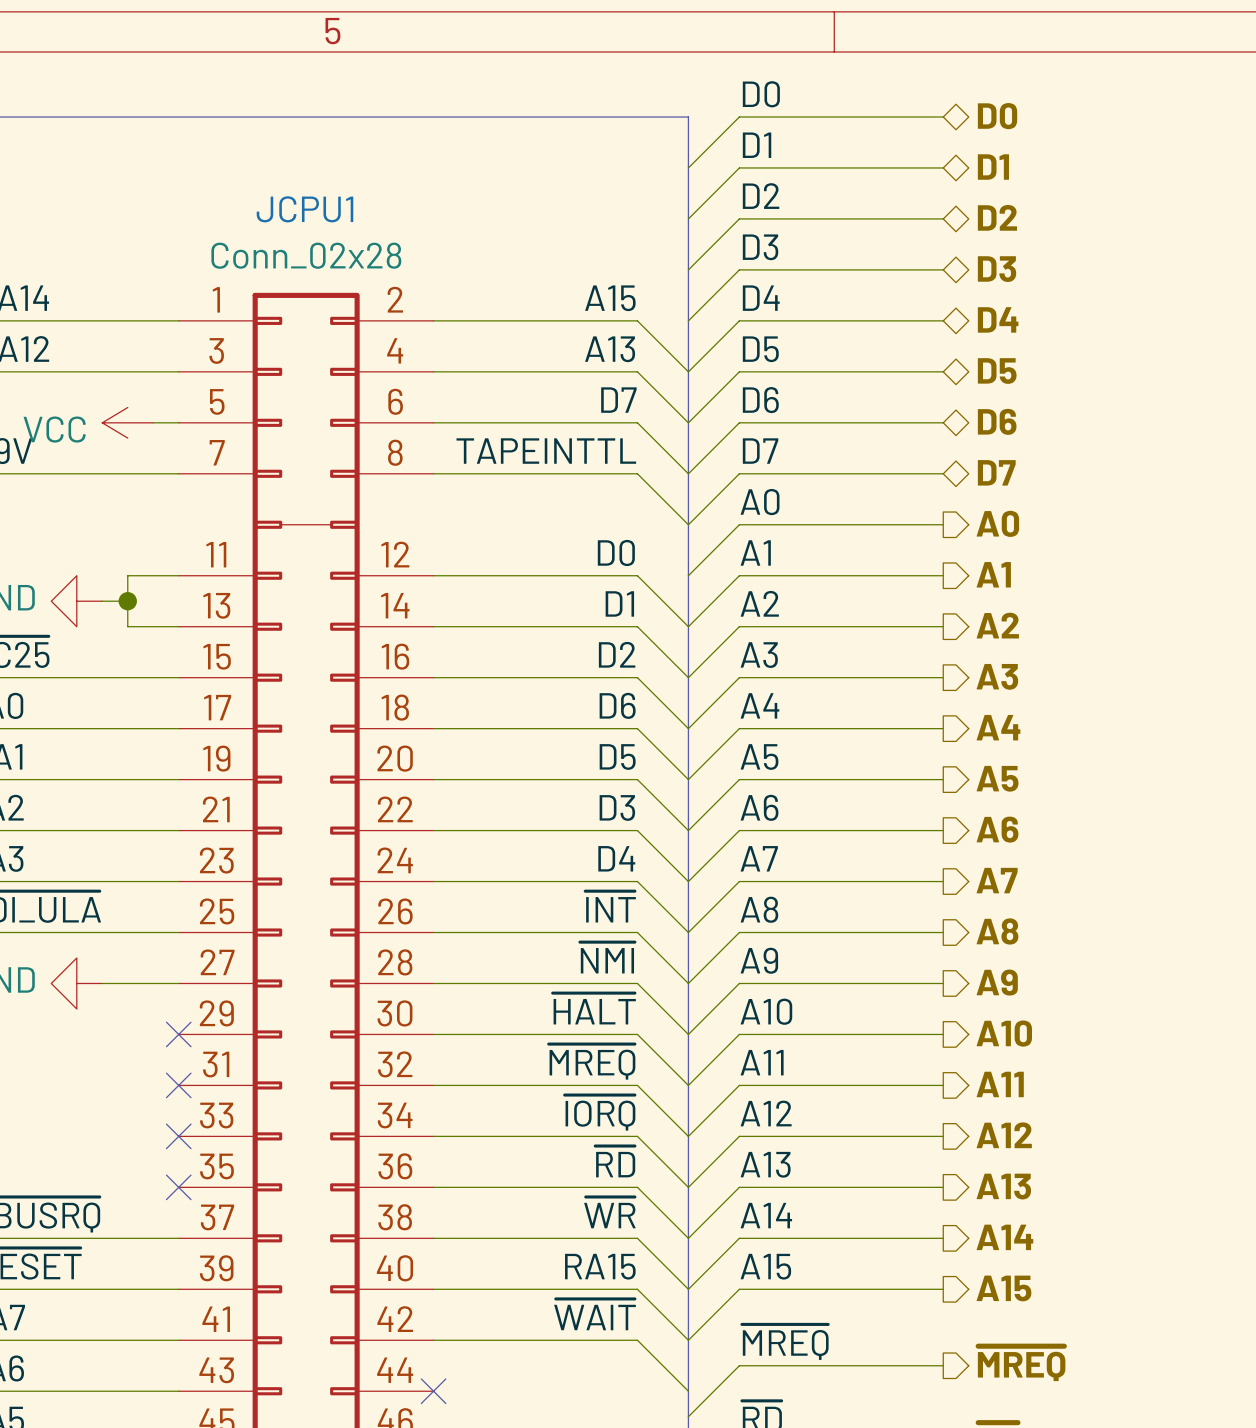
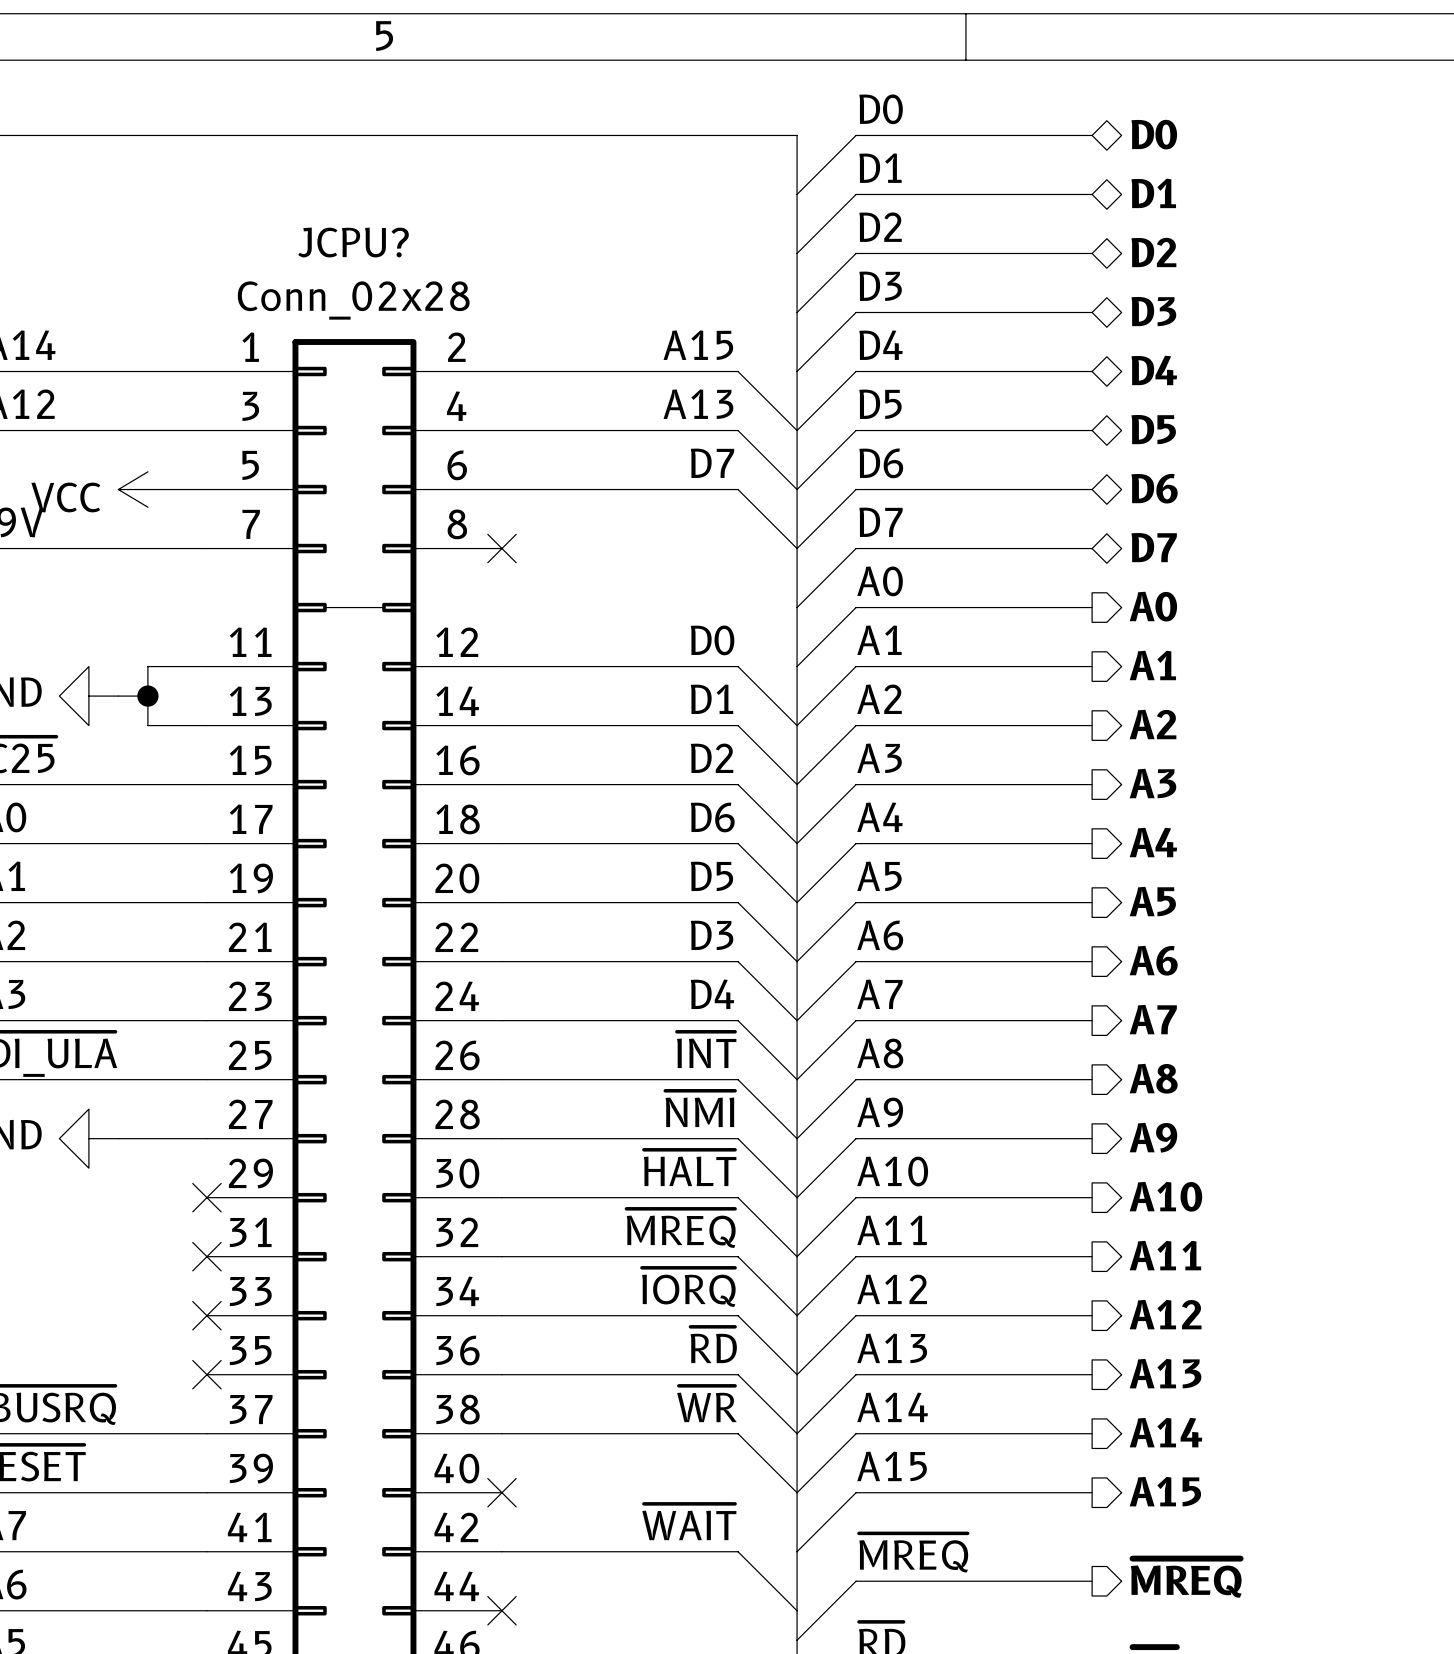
JCPU1 name: JCPU1 (304, 209) -> JCPU? (353, 242)
label: TAPEINTTL (546, 451) -> none
wire: (433, 473) (637, 473) (688, 524) -> none
no-connect mark: none -> (501, 548)
label: RA15 (600, 1266) -> none
wire: (433, 1289) (637, 1289) (688, 1340) -> none
no-connect mark: none -> (501, 1492)

